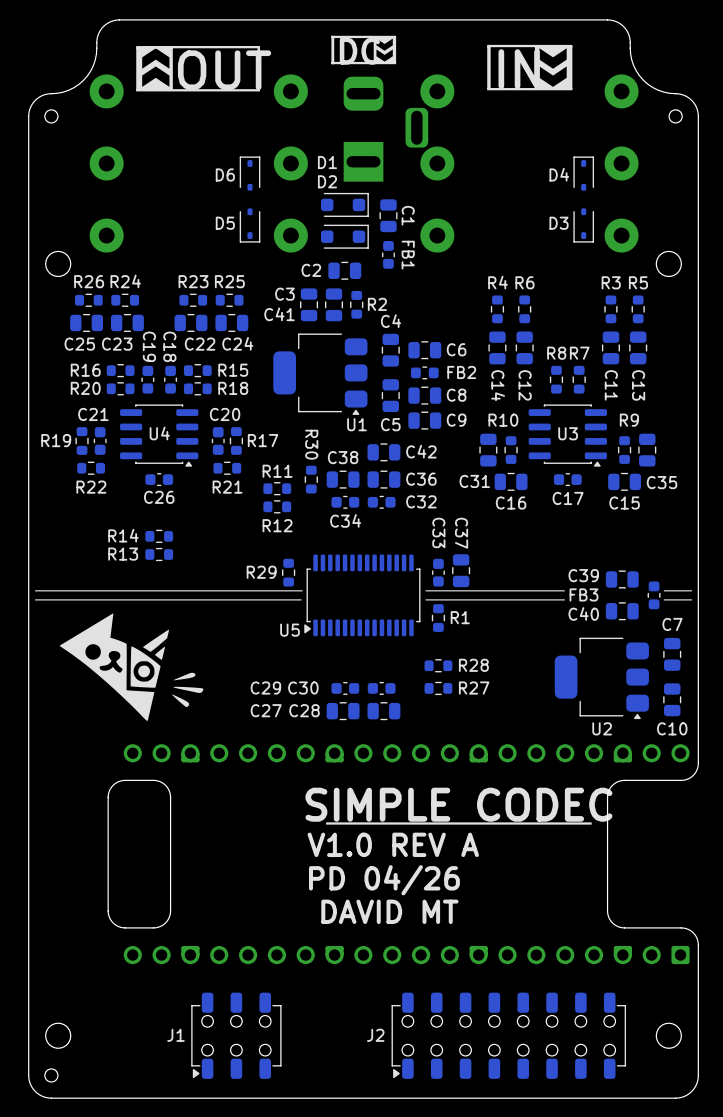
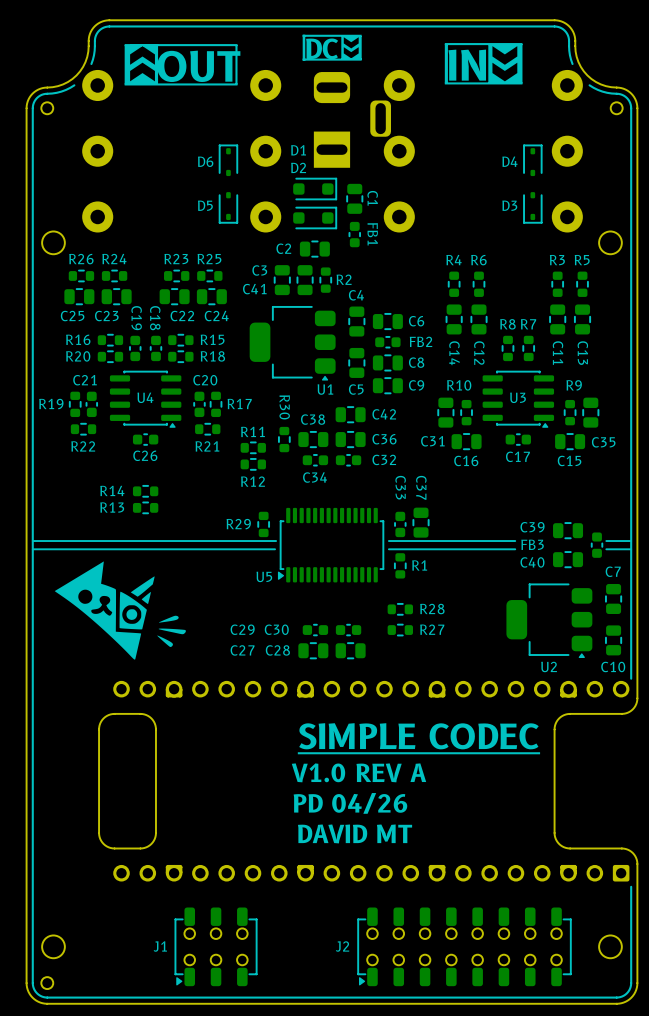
line: none -> (572, 64) (567, 35) (561, 28) (554, 26) (107, 26) (100, 29) (96, 35) (91, 64)
line: none -> (74, 85) (61, 91) (40, 95) (34, 101) (32, 108) (32, 983) (35, 991) (47, 997) (618, 997) (626, 993) (631, 984) (631, 886)
line: none -> (589, 85) (602, 91) (623, 95) (631, 106) (631, 678)

